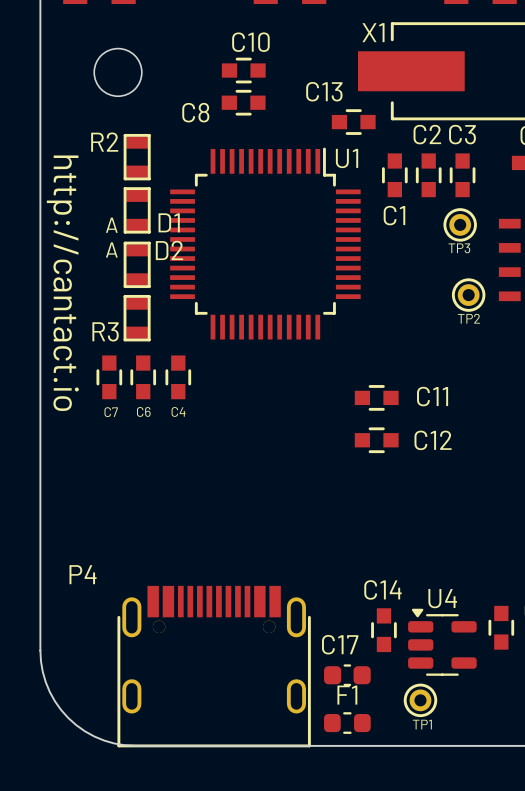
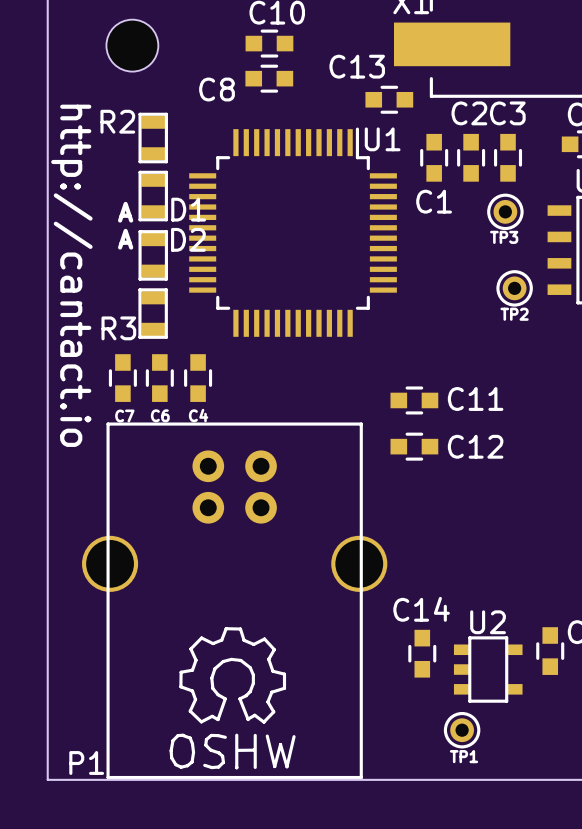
P1: none -> (234, 600)
drawing: none -> [169, 627, 296, 770]
U4: (442, 642) -> none
U2: none -> (488, 669)
board edge: (40, 650) (42, 671) (49, 691) (68, 718) (94, 736) (114, 743) (135, 745) -> (47, 676) (47, 779) (151, 779)
P4: (214, 666) -> none
C17: (347, 675) -> none
F1: (347, 723) -> none

